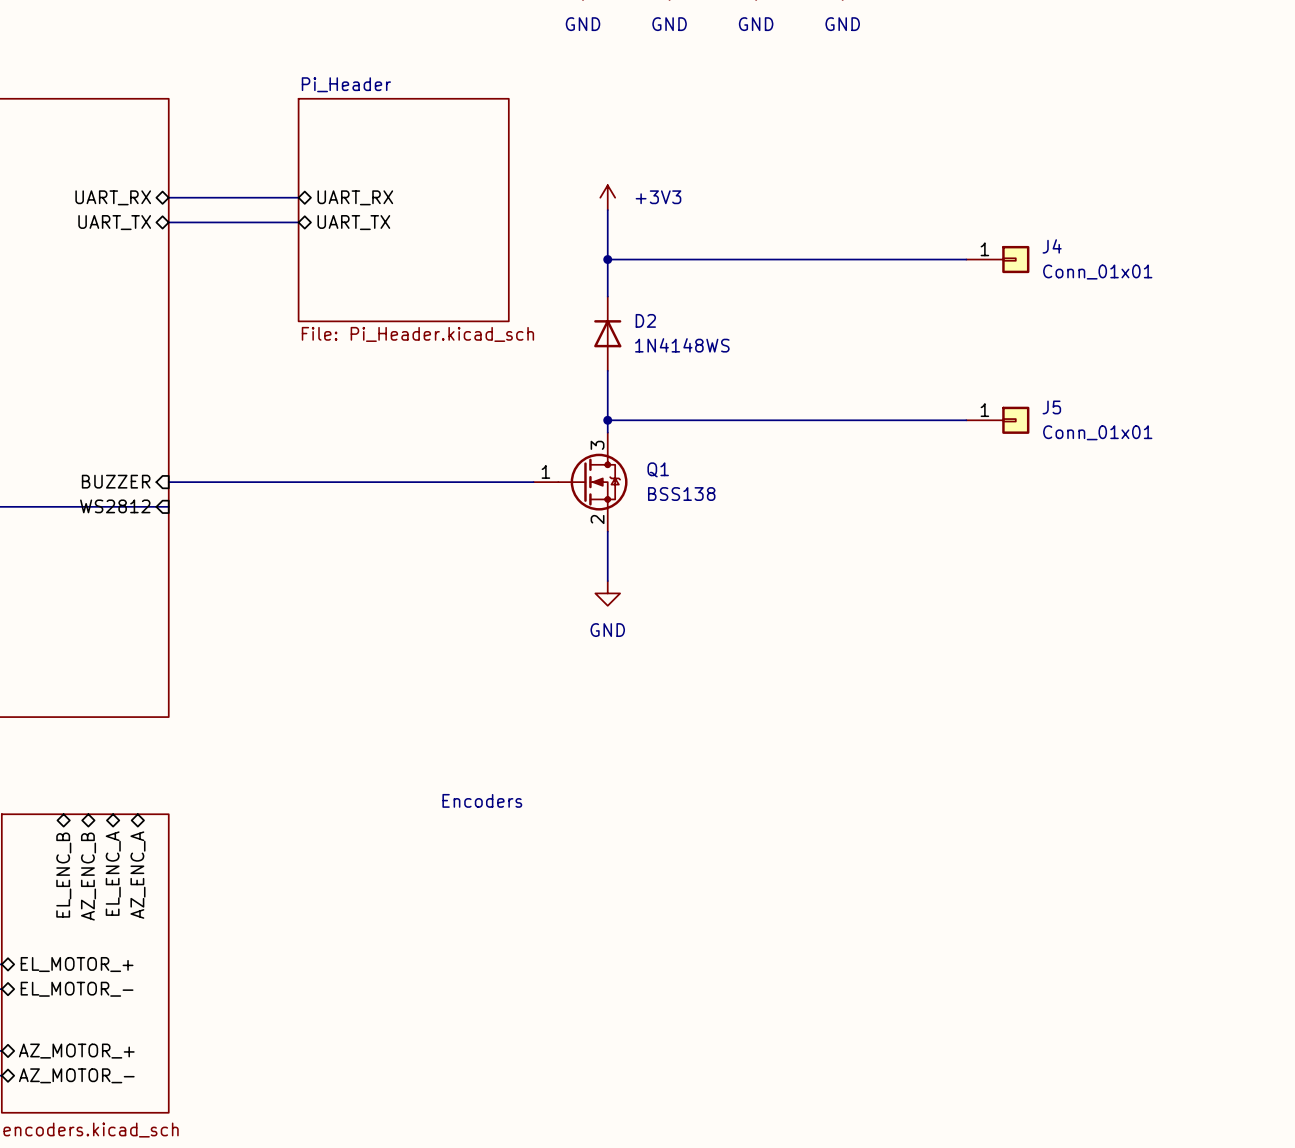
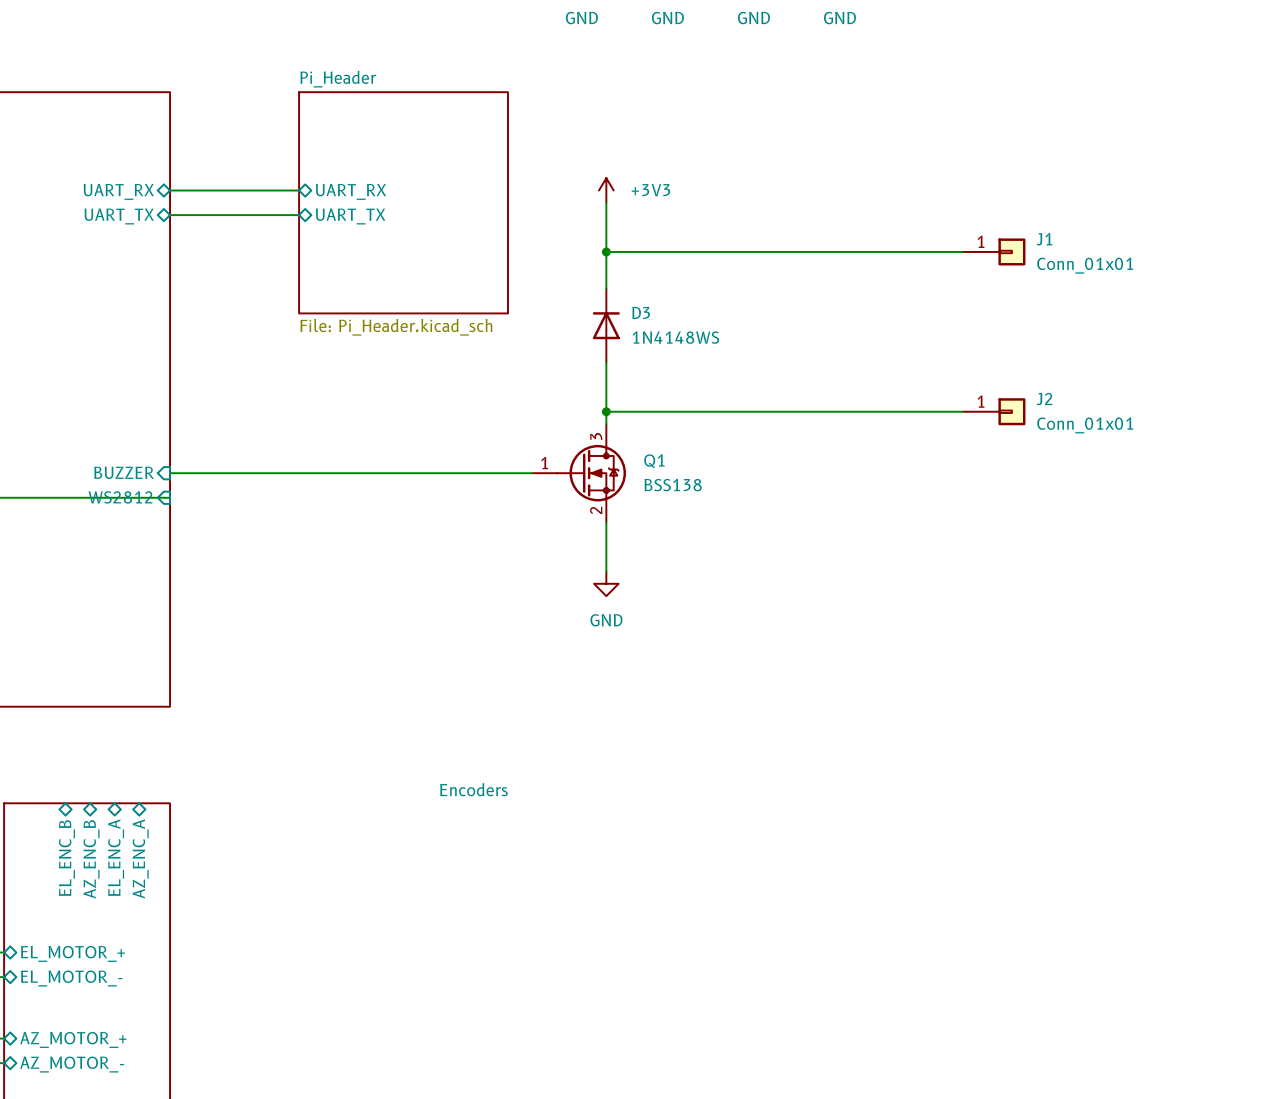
J4 name: J4 (1052, 246) -> J1 (1044, 239)
D2 name: D2 (645, 320) -> D3 (641, 312)
J5 name: J5 (1051, 407) -> J2 (1044, 399)

